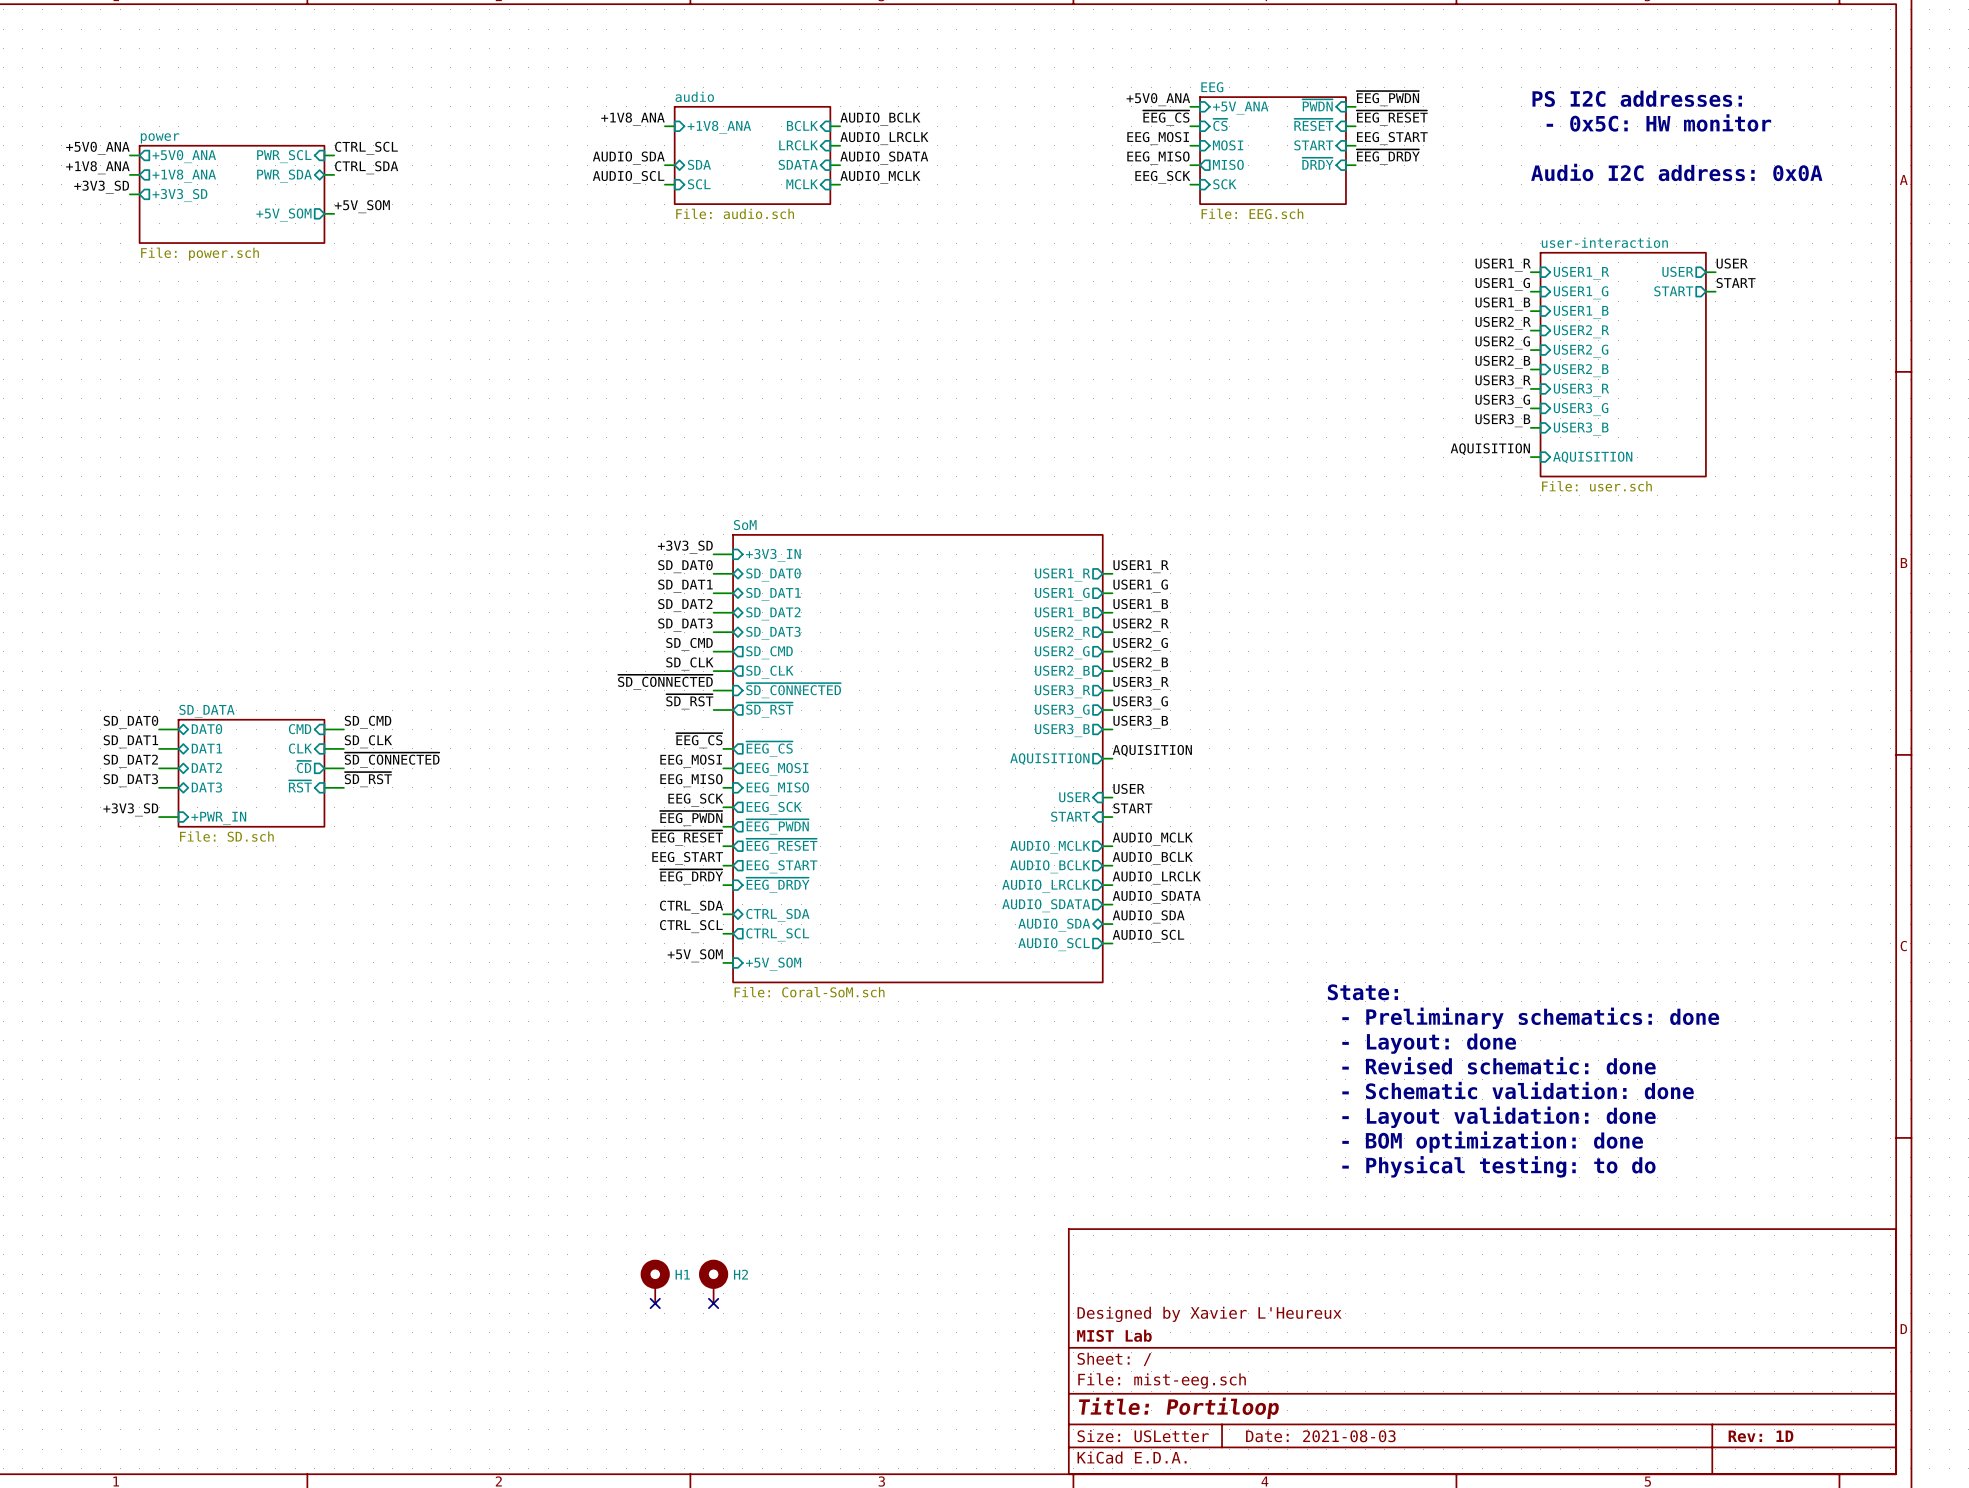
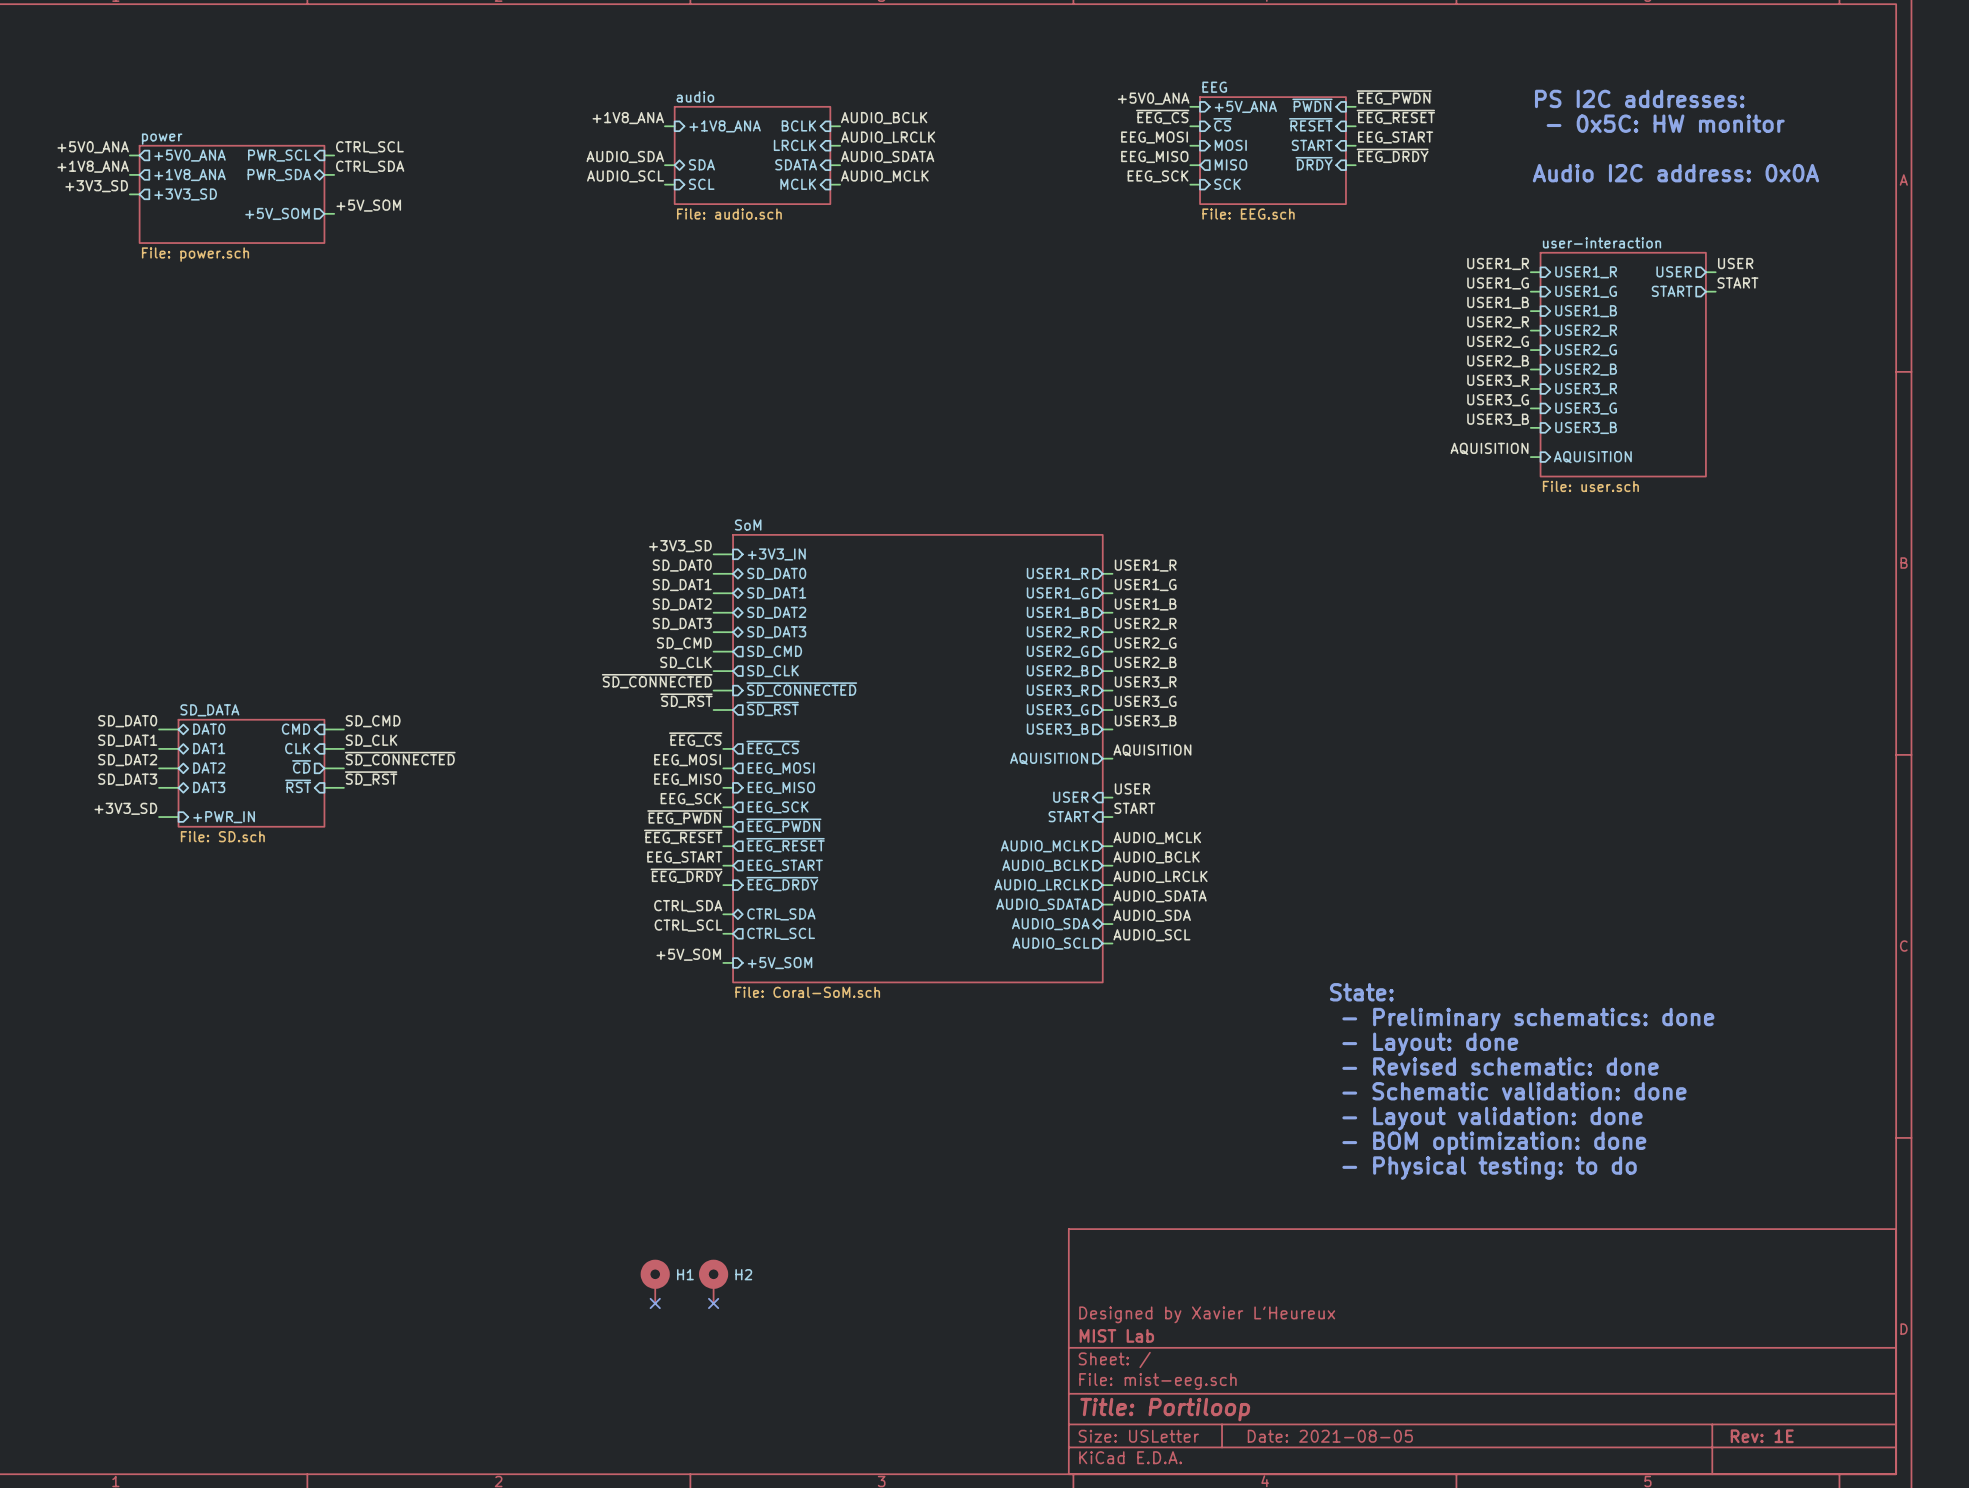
title block: Date: 2021-08-03 (1320, 1436) -> Date: 2021-08-05 (1330, 1436)
title block: Rev: 1D (1760, 1436) -> Rev: 1E (1762, 1436)

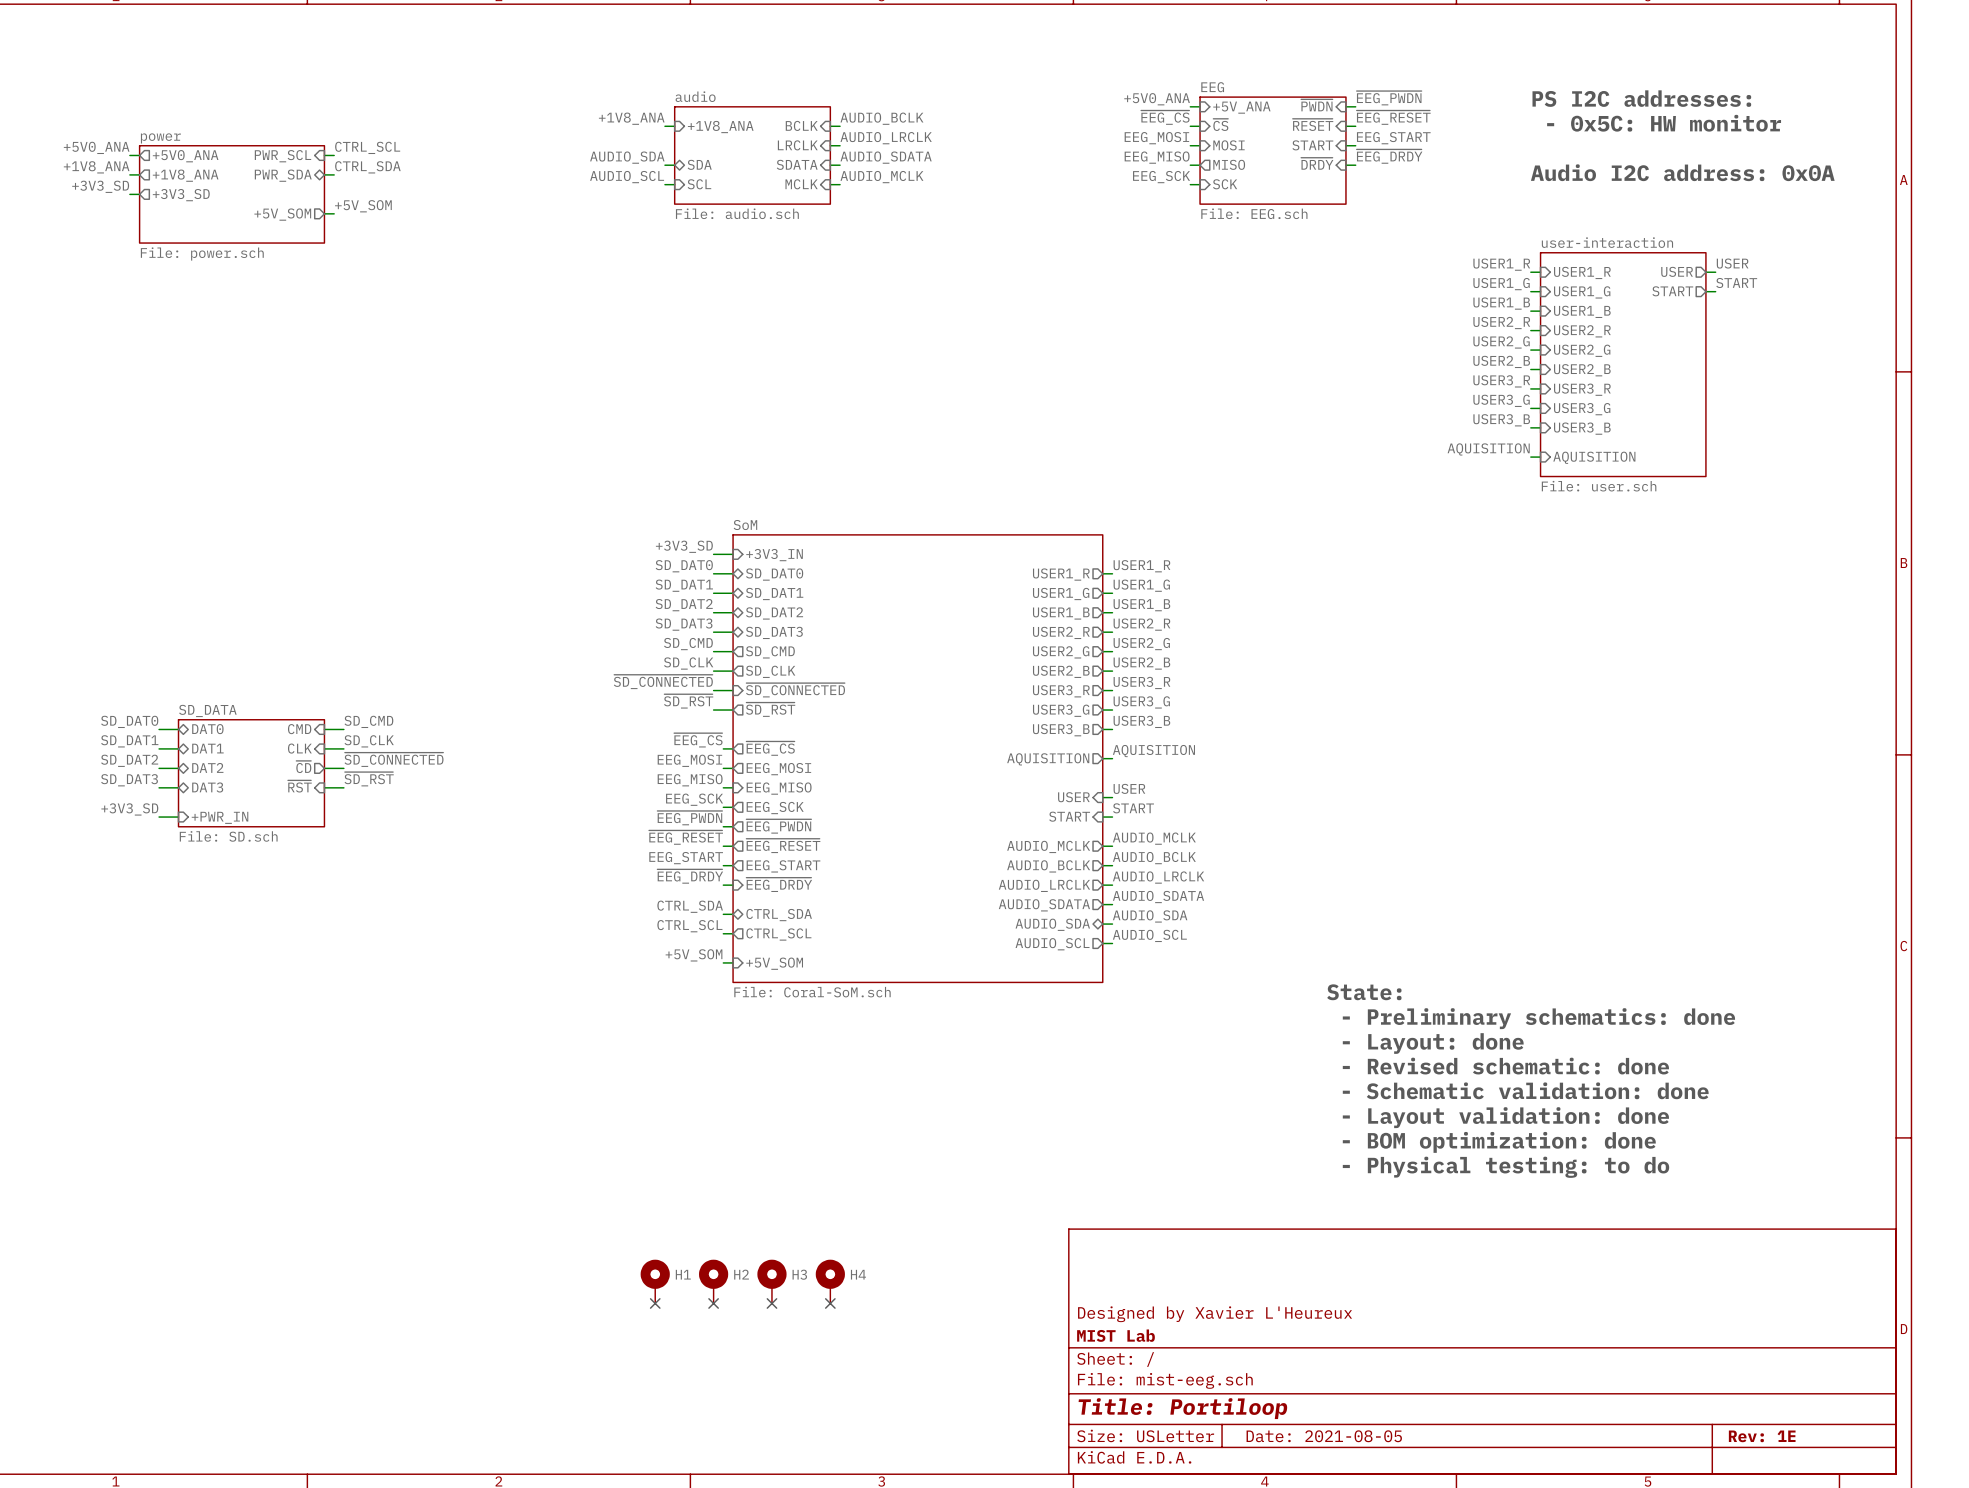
H3: none -> (771, 1281)
H4: none -> (830, 1281)
no-connect mark: none -> (771, 1303)
no-connect mark: none -> (830, 1303)

